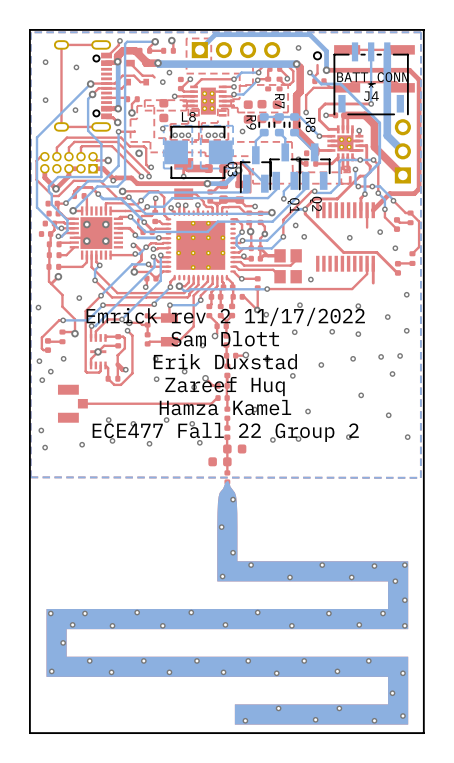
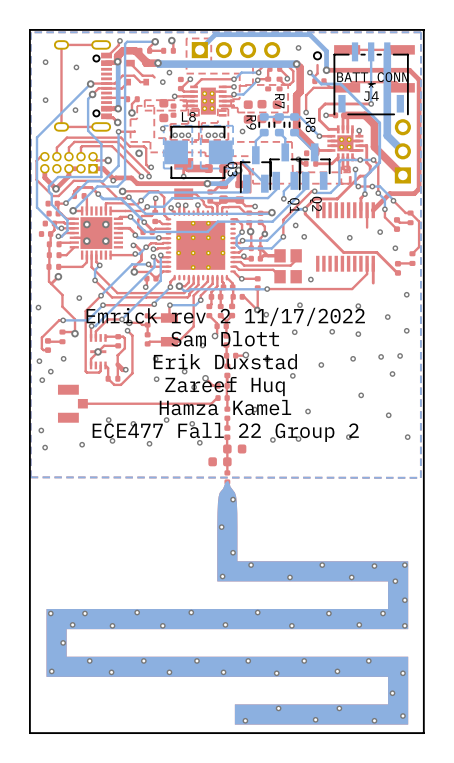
part: none -> (173, 110)

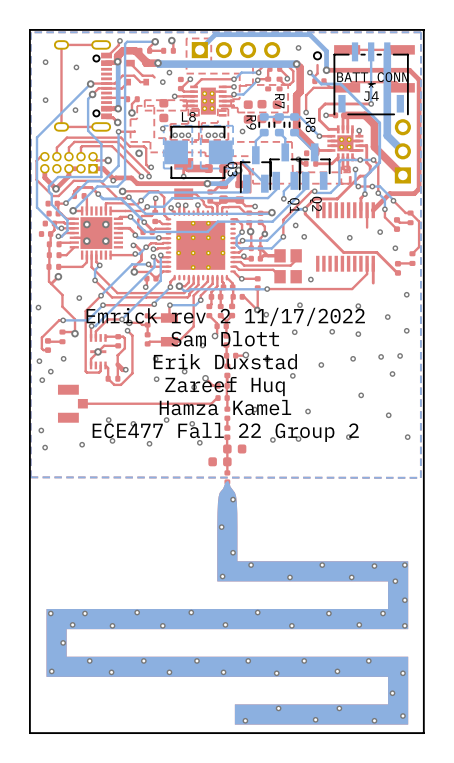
part: (173, 110) -> none

